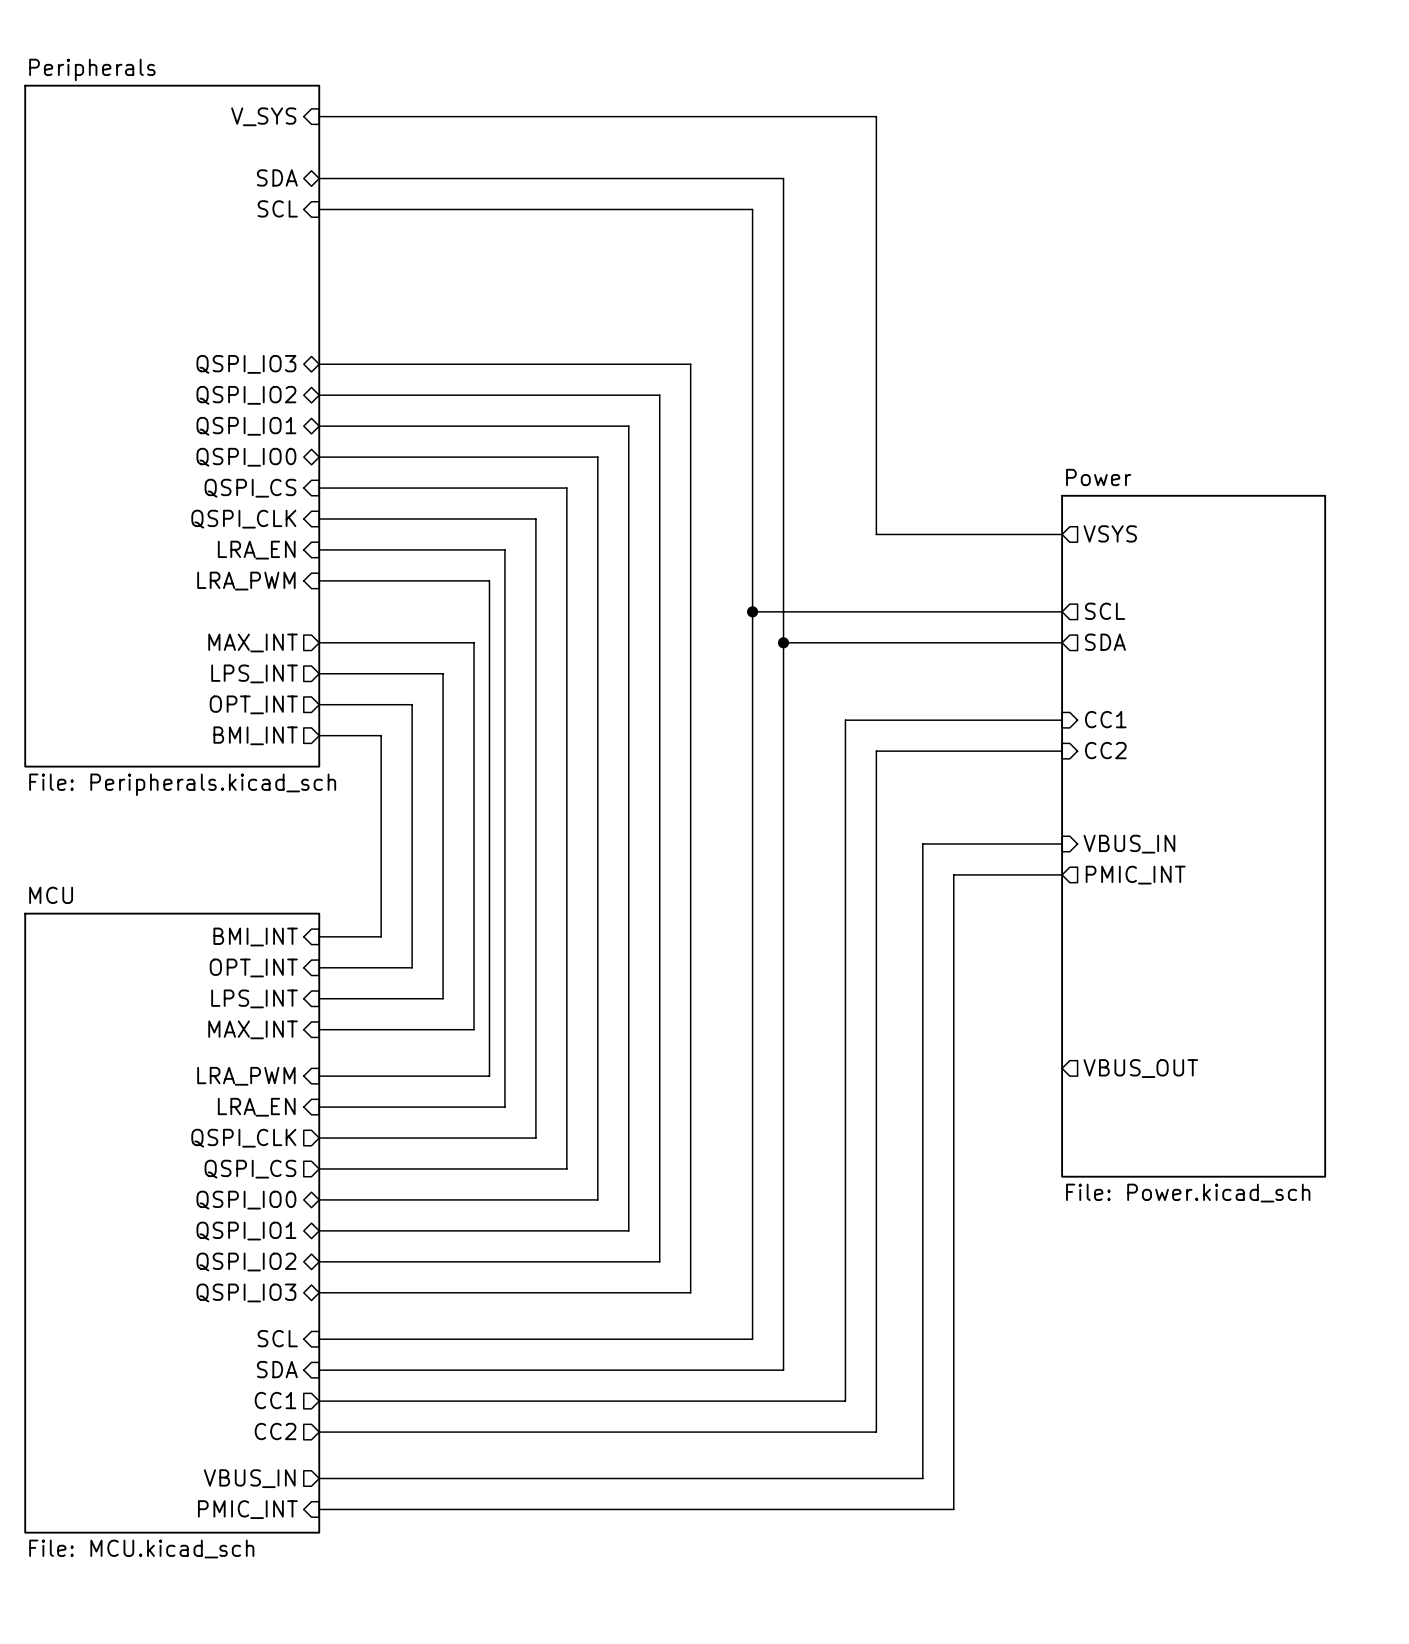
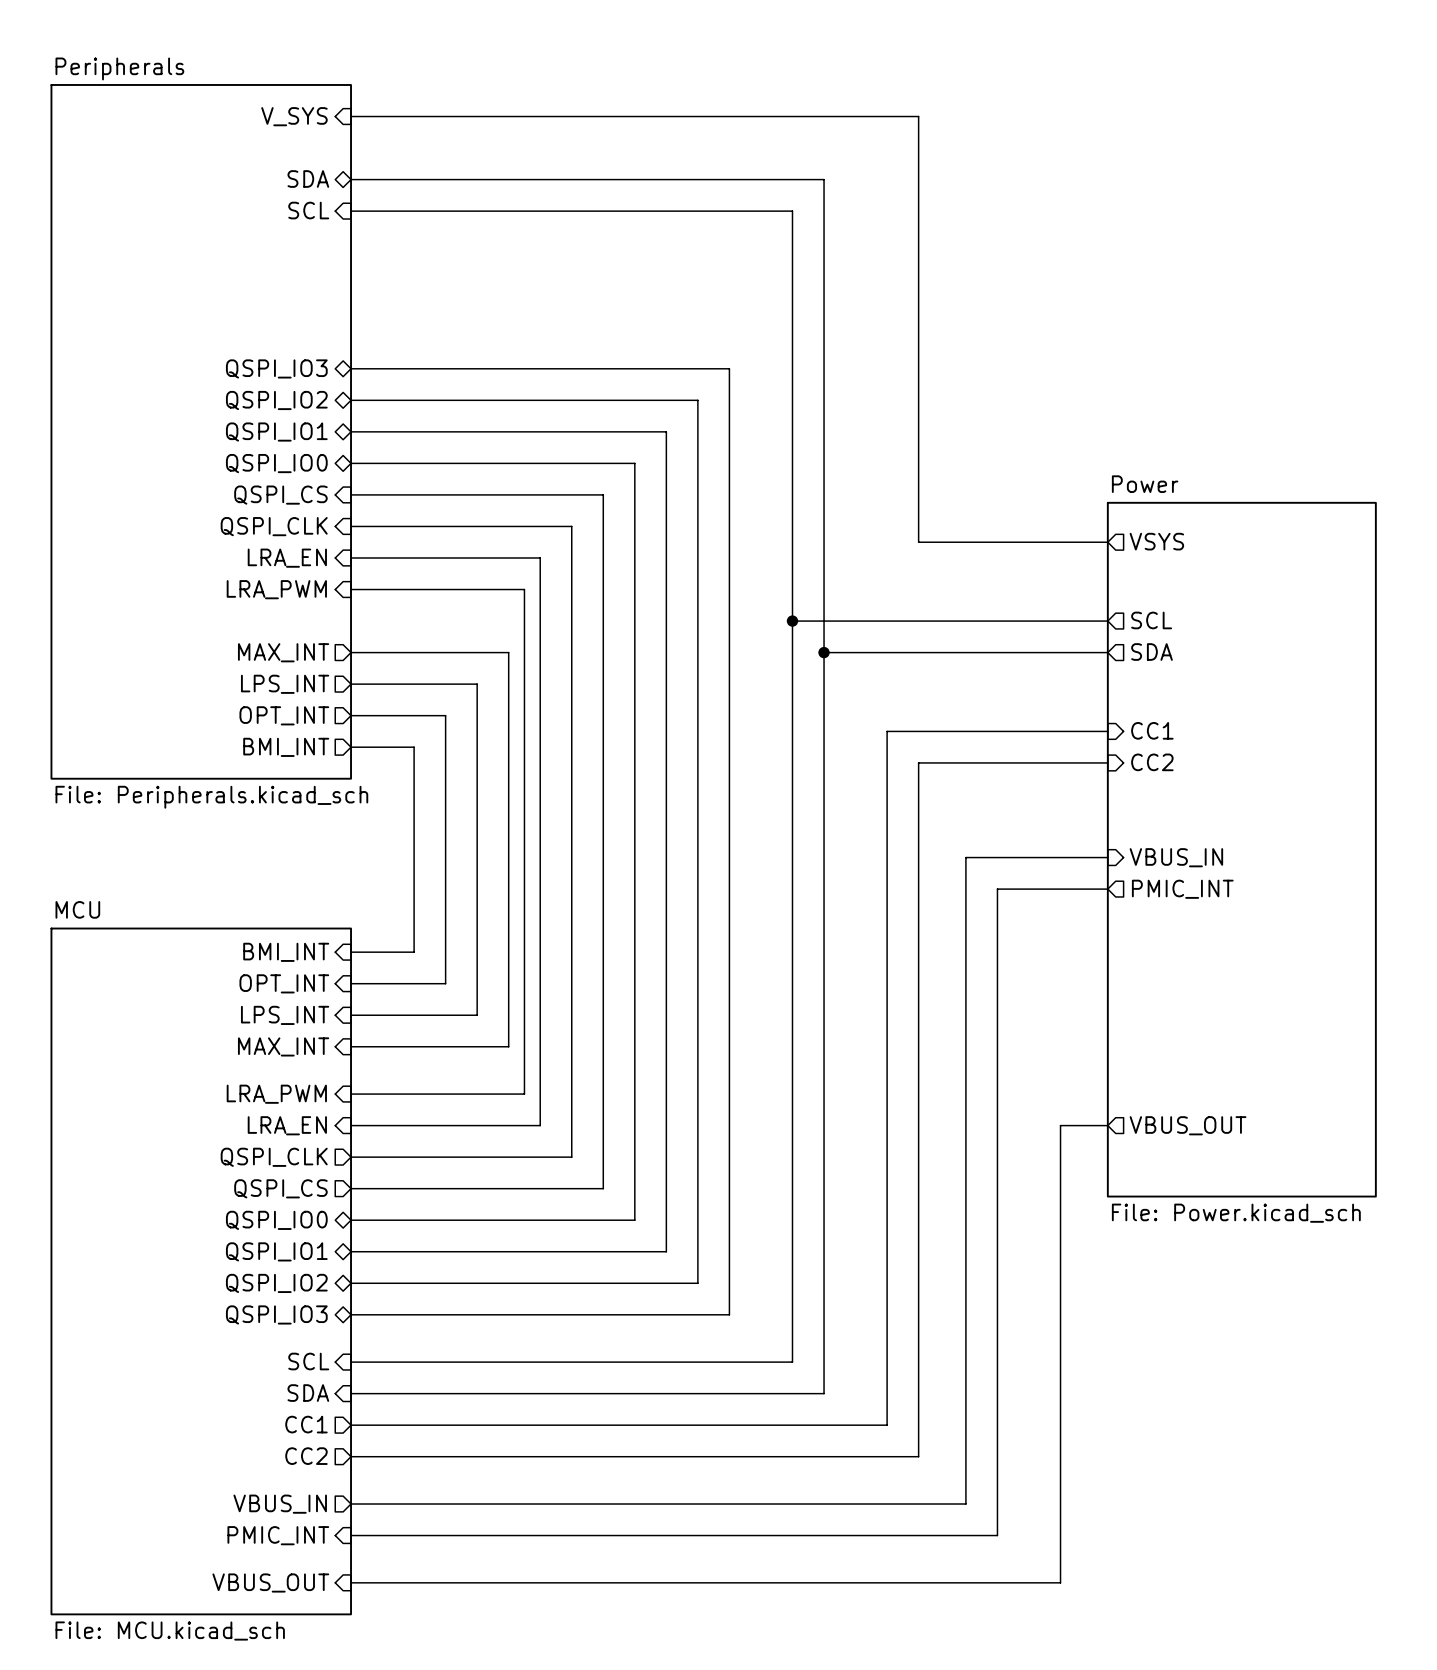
sheet pin position: VBUS_OUT (1140, 1068) -> VBUS_OUT (1188, 1125)
wire: none -> (1107, 1125) (1060, 1125) (1060, 1582) (351, 1582)
sheet MCU: File: MCU.kicad_sch (172, 1223) -> none
sheet MCU: none -> File: MCU.kicad_sch (201, 1271)
sheet pin: none -> VBUS_OUT (270, 1583)

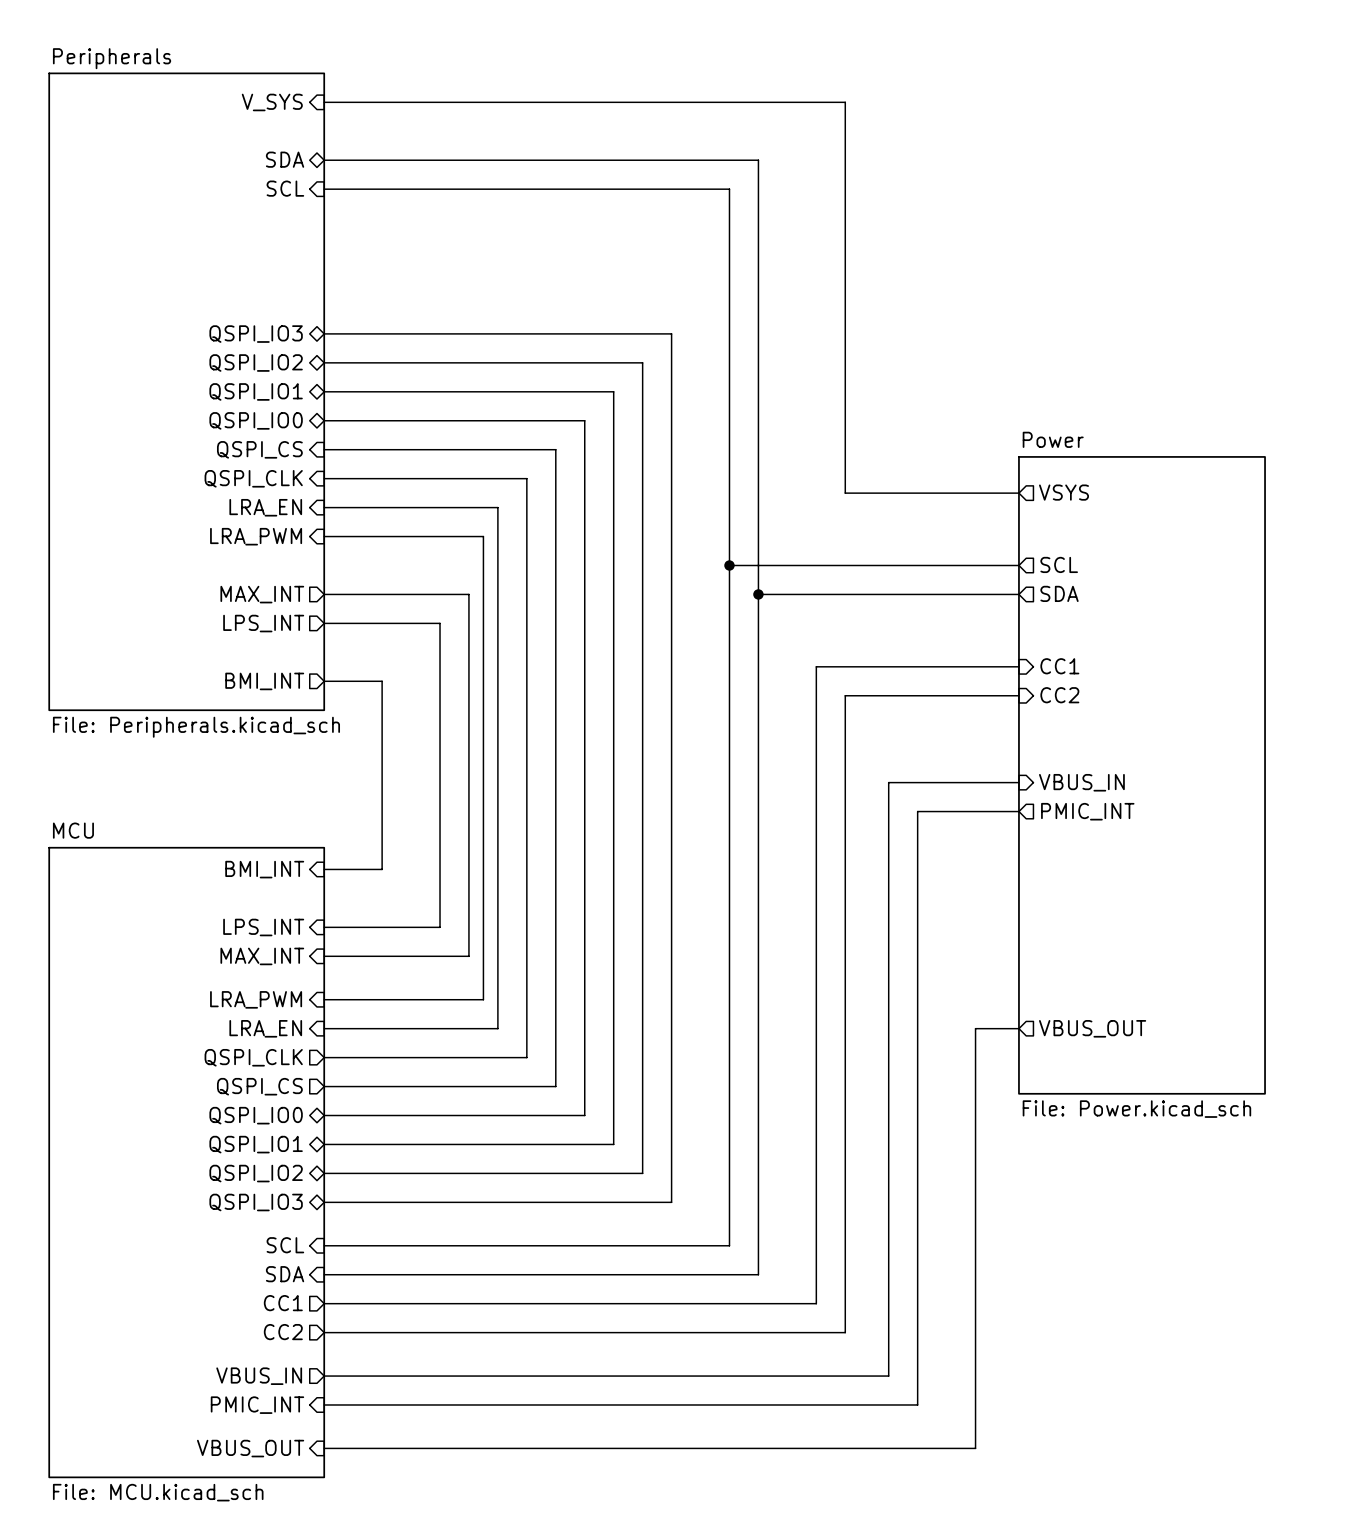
sheet pin: OPT_INT (284, 715) -> none
wire: (351, 715) (445, 715) (445, 983) (351, 983) -> none
sheet pin: OPT_INT (284, 983) -> none

